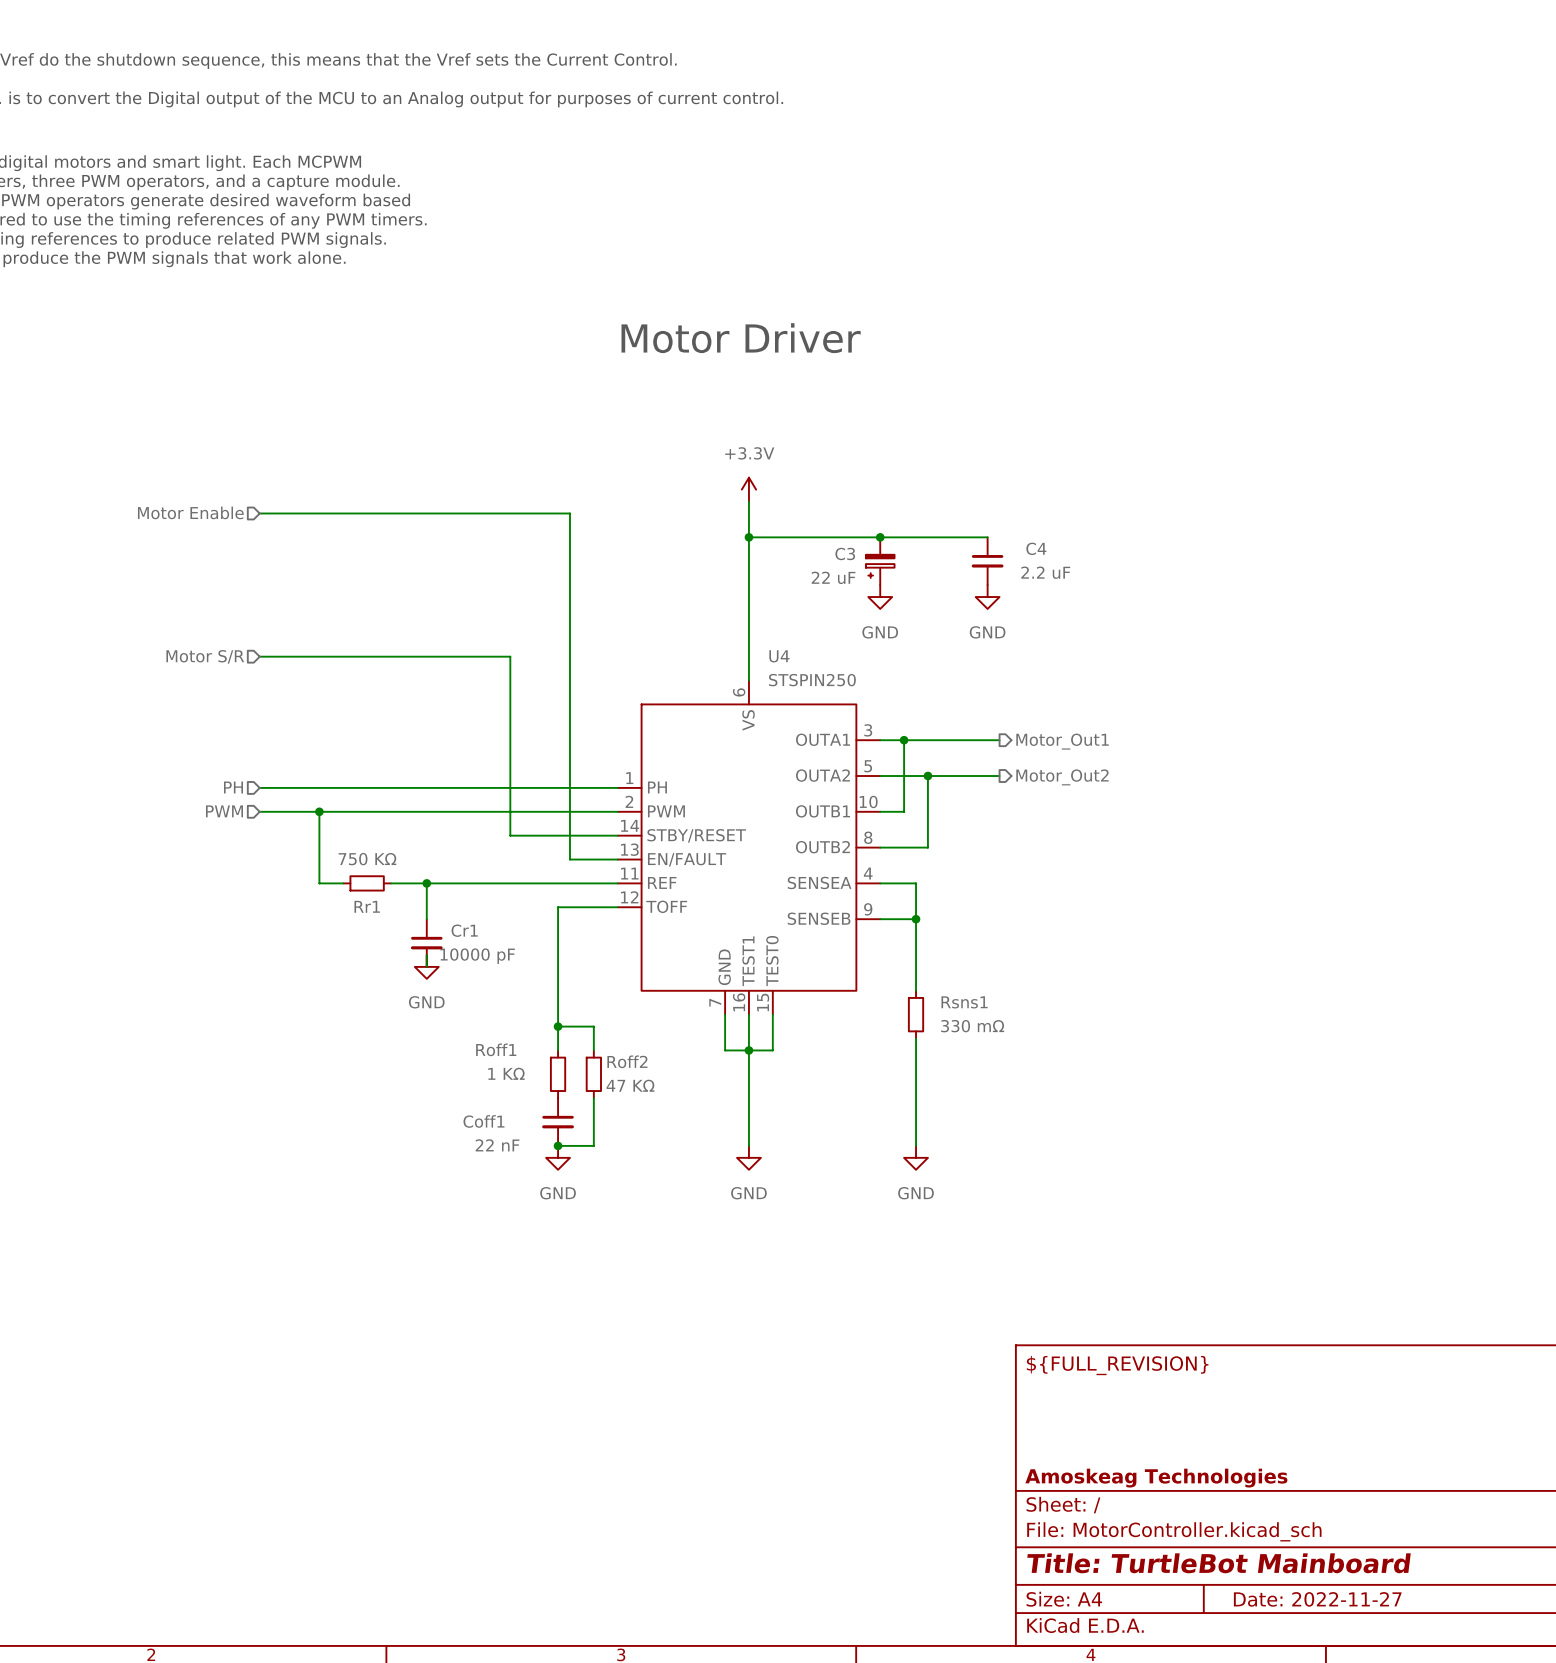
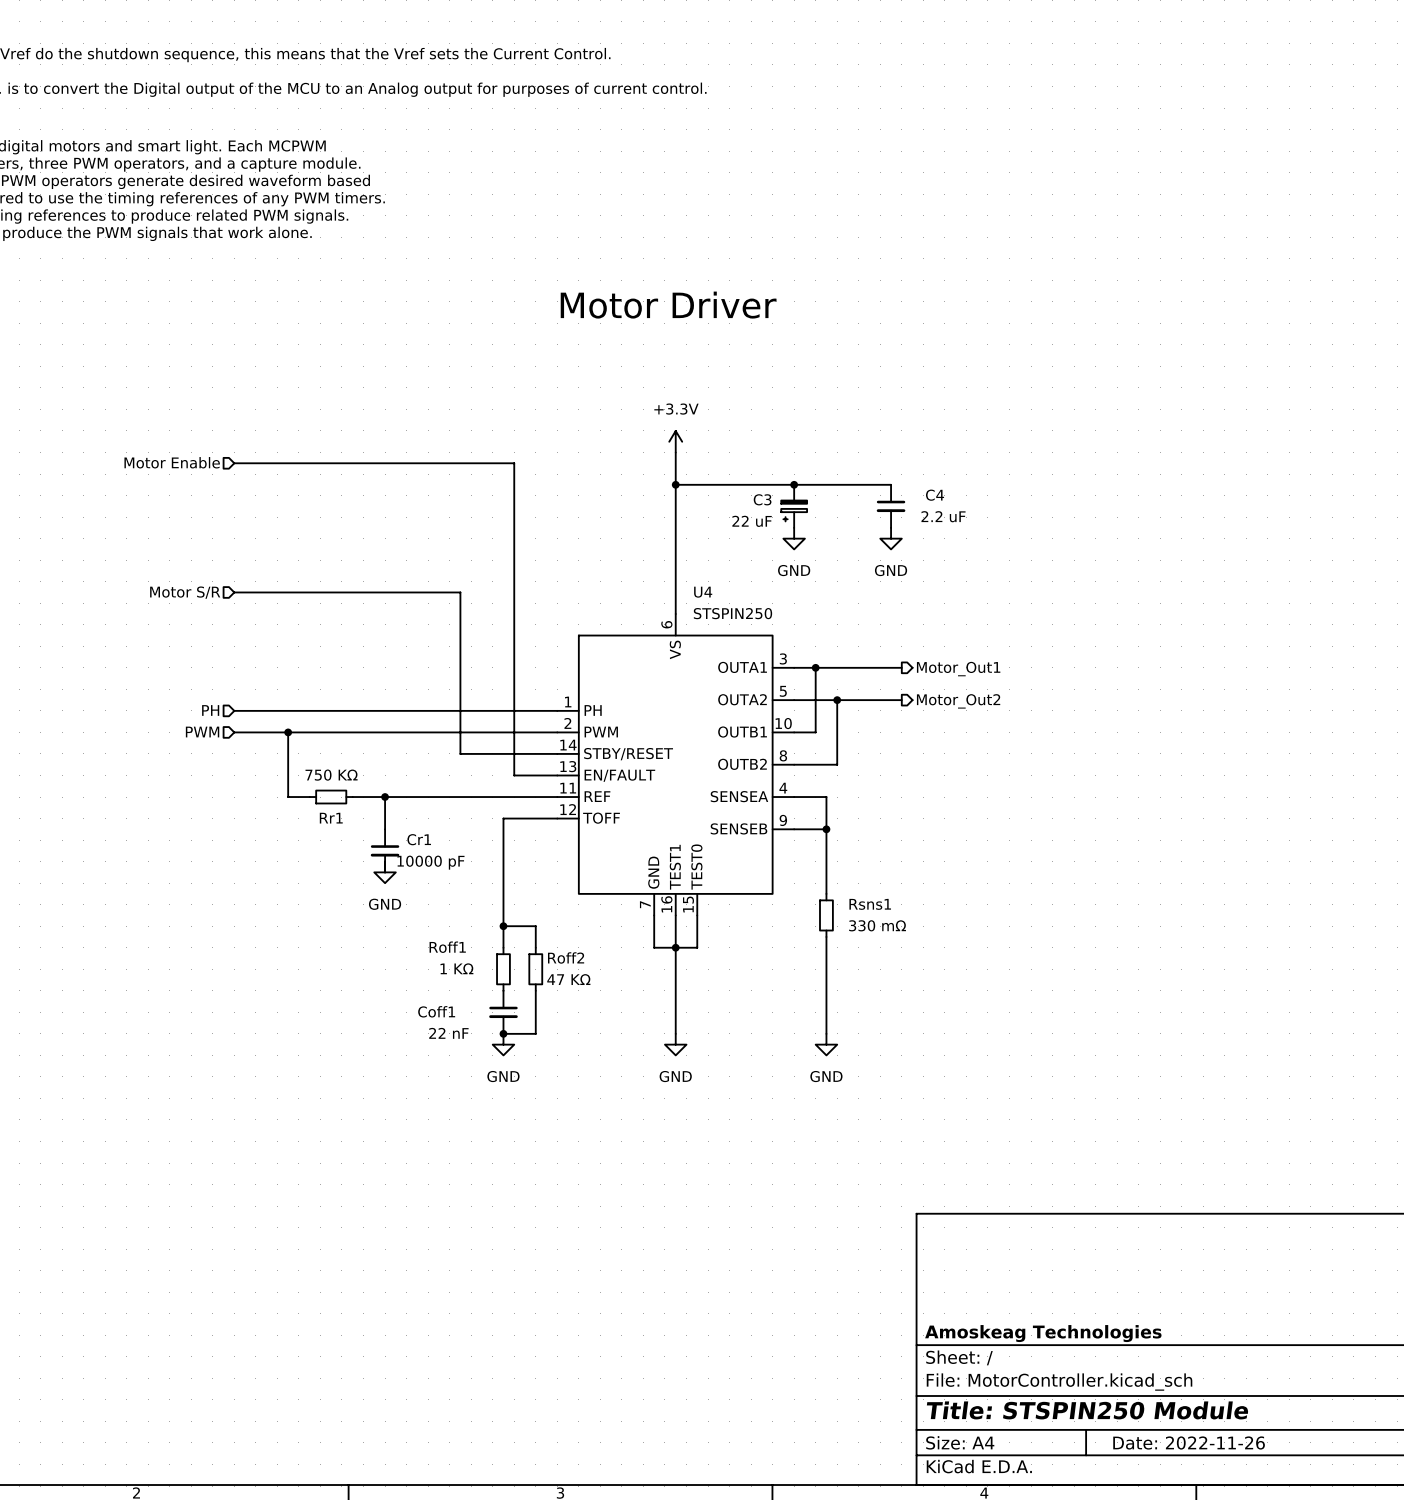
title block: ${FULL_REVISION} (1117, 1365) -> none
title block: Title: TurtleBot Mainboard (1219, 1563) -> Title: STSPIN250 Module (1087, 1410)
title block: Date: 2022-11-27 (1317, 1599) -> Date: 2022-11-26 (1189, 1443)

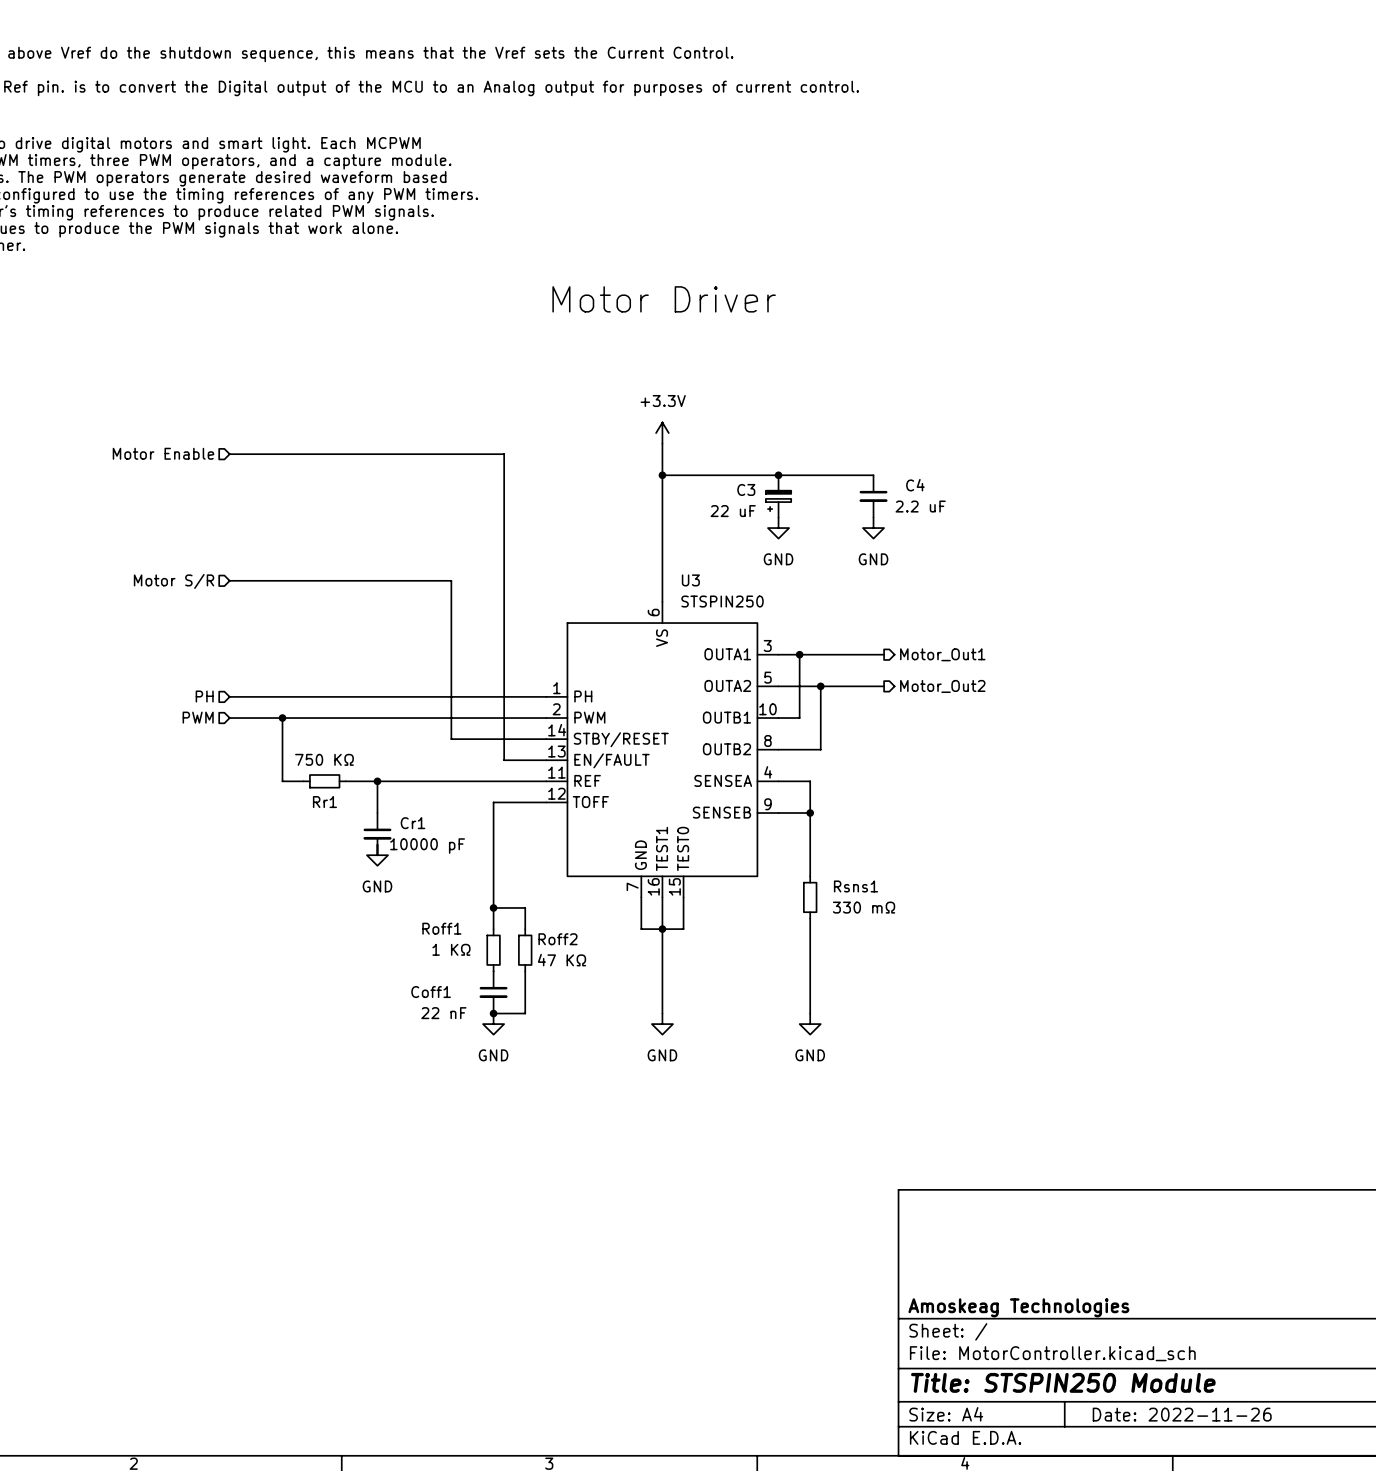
U4 name: U4 (703, 592) -> U3 (690, 580)

